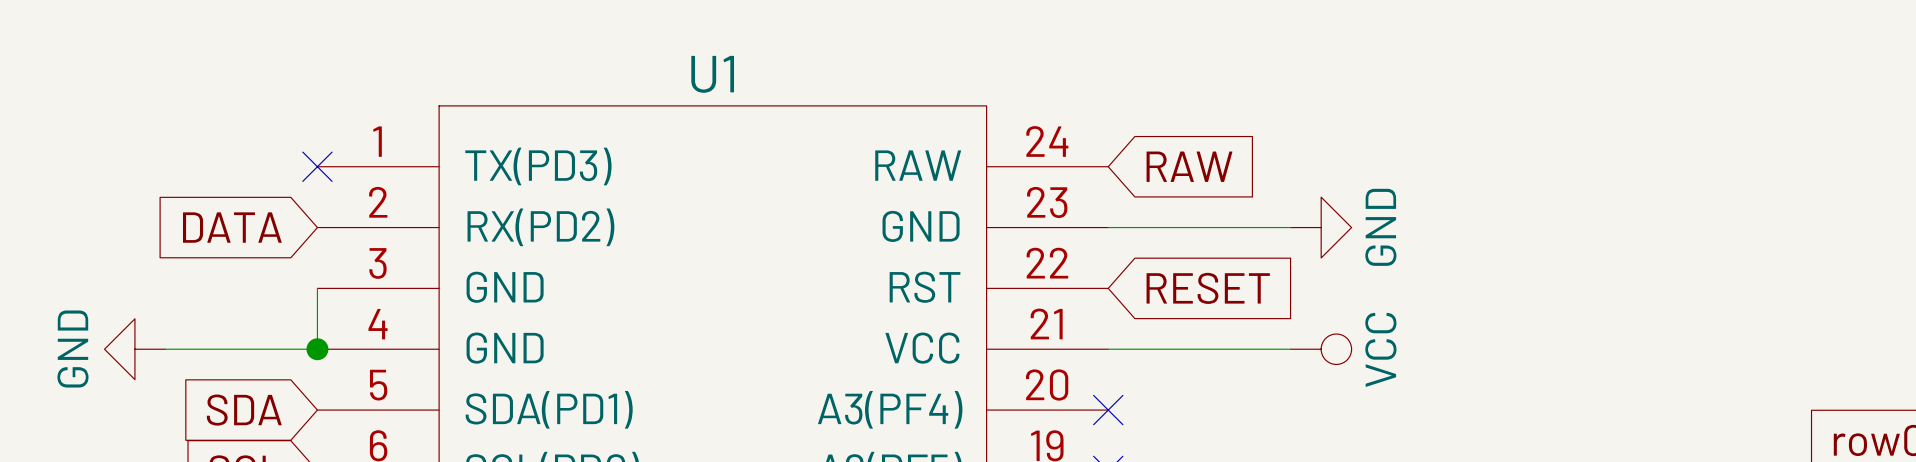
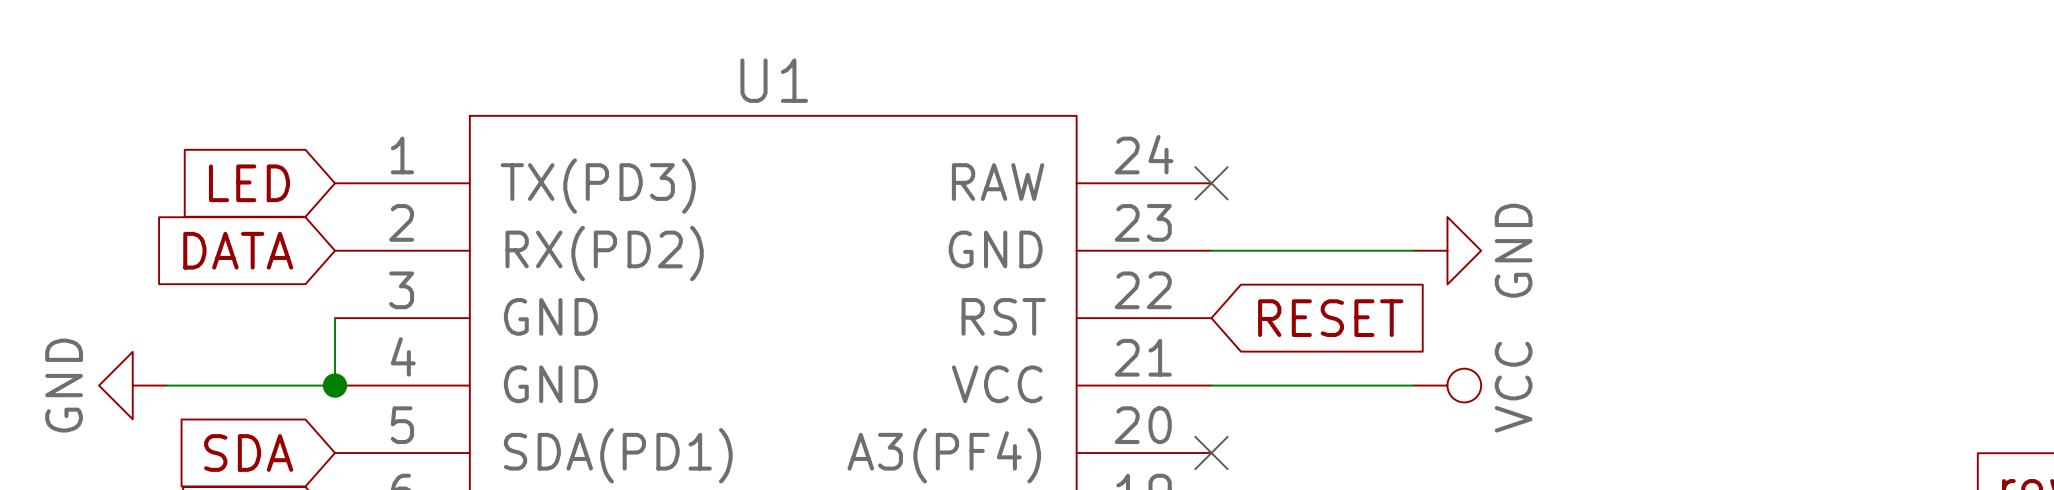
global label: none -> LED (249, 183)
no-connect mark: (317, 166) -> none
no-connect mark: none -> (1211, 183)
global label: RAW (1189, 166) -> none

